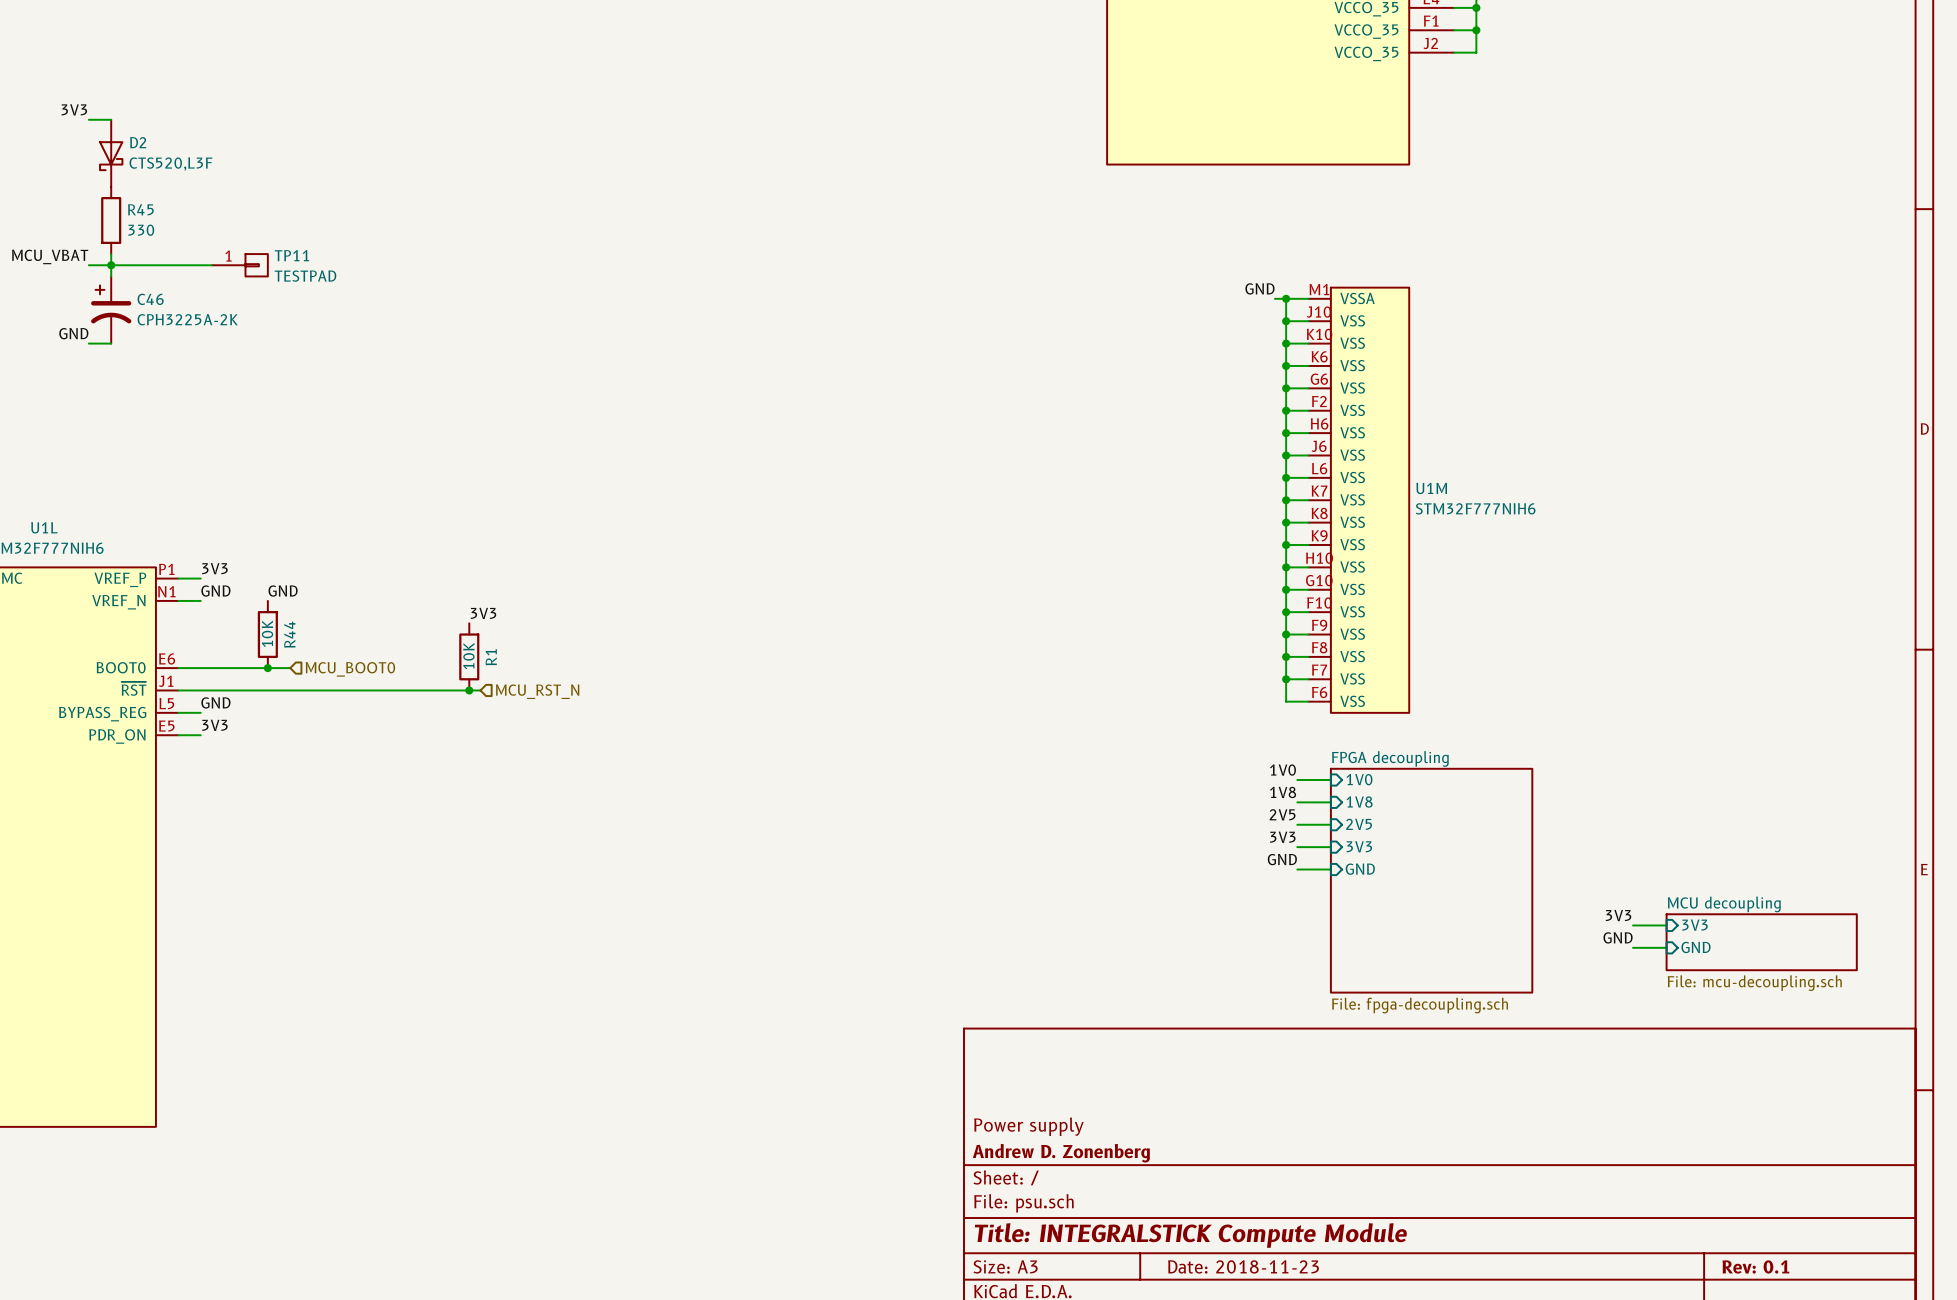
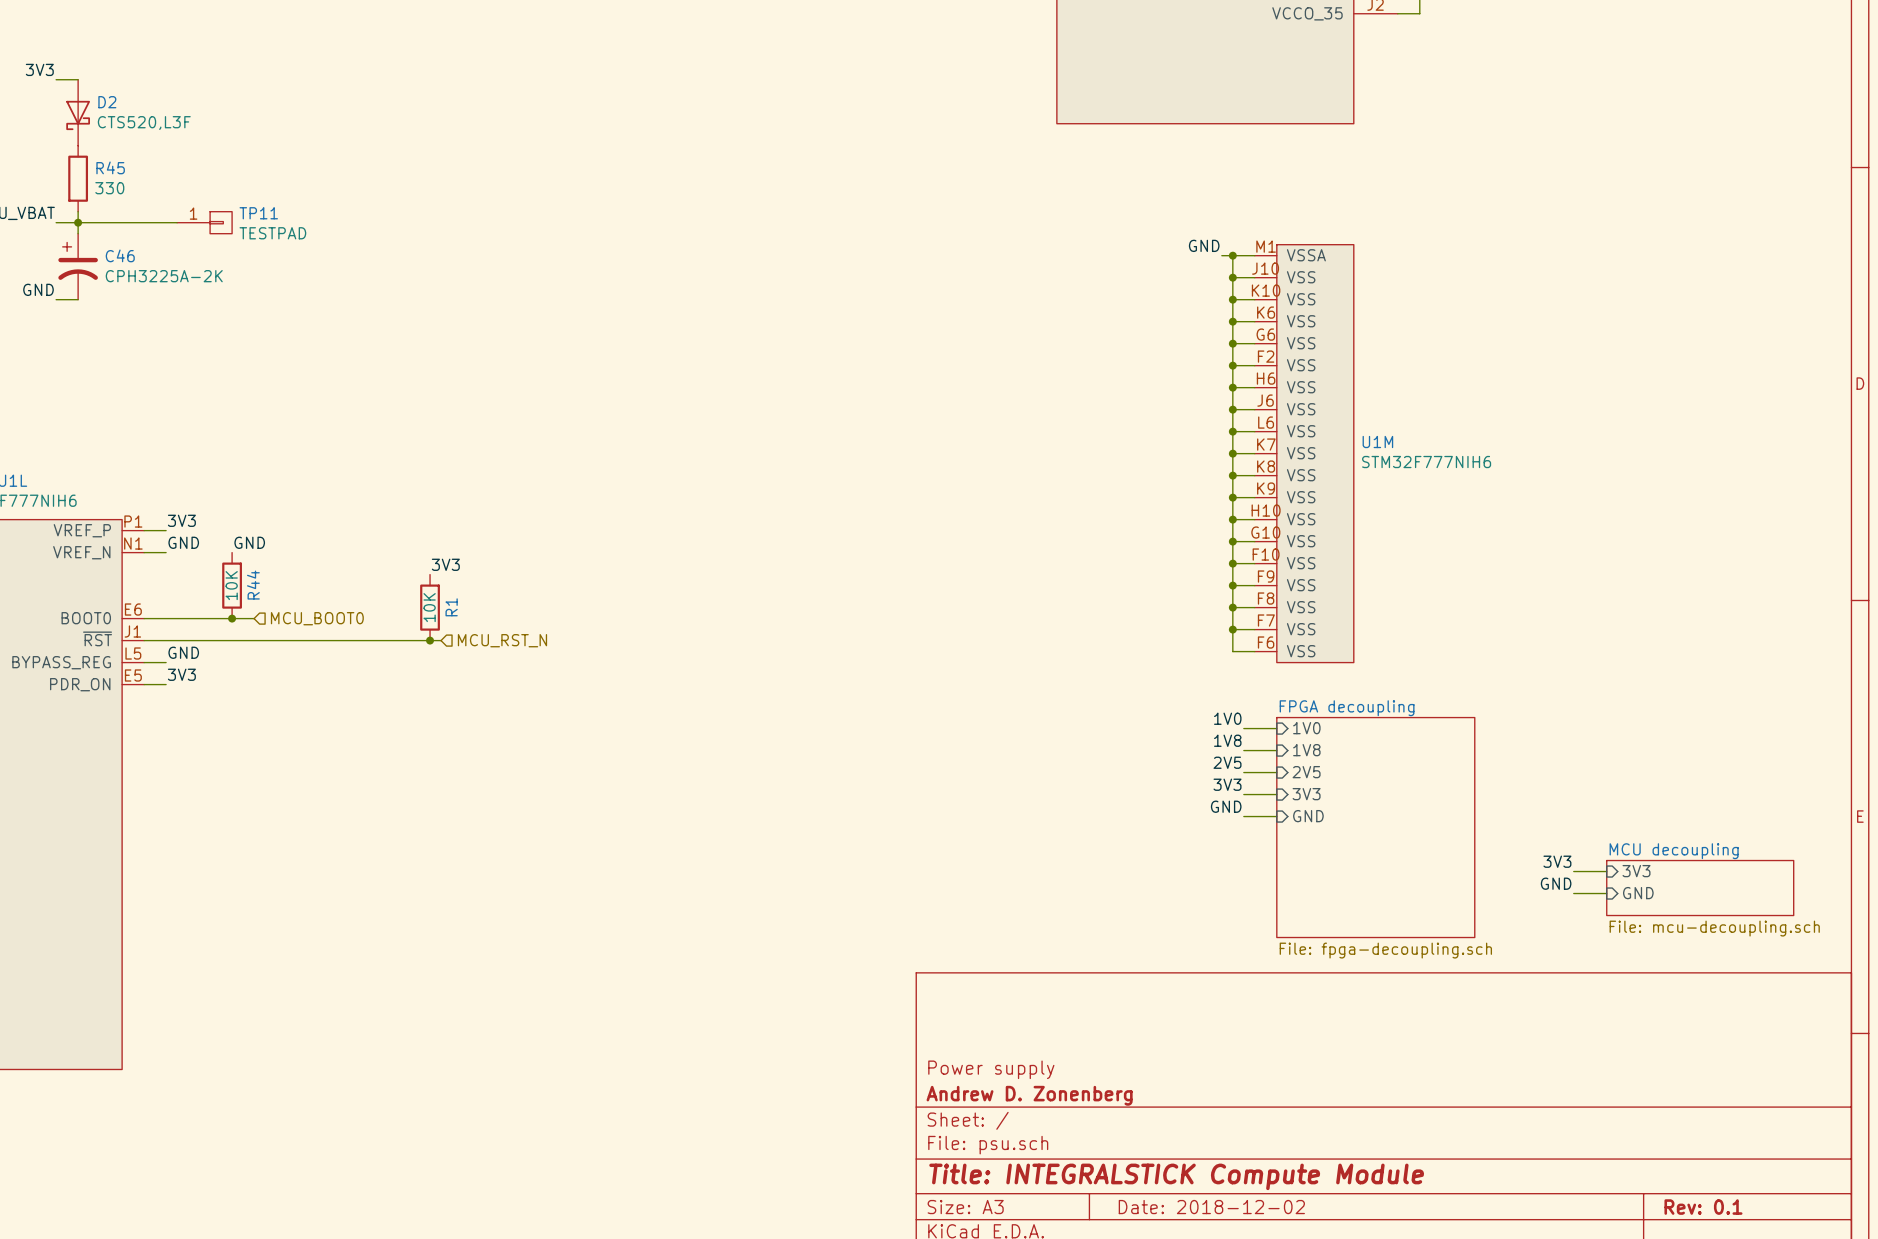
title block: Date: 2018-11-23 (1243, 1266) -> Date: 2018-12-02 (1211, 1207)

